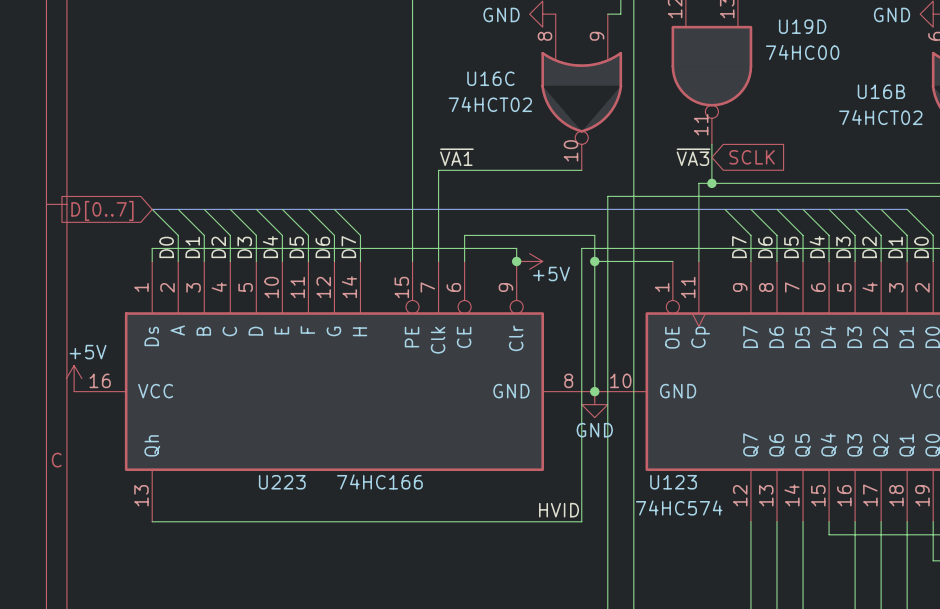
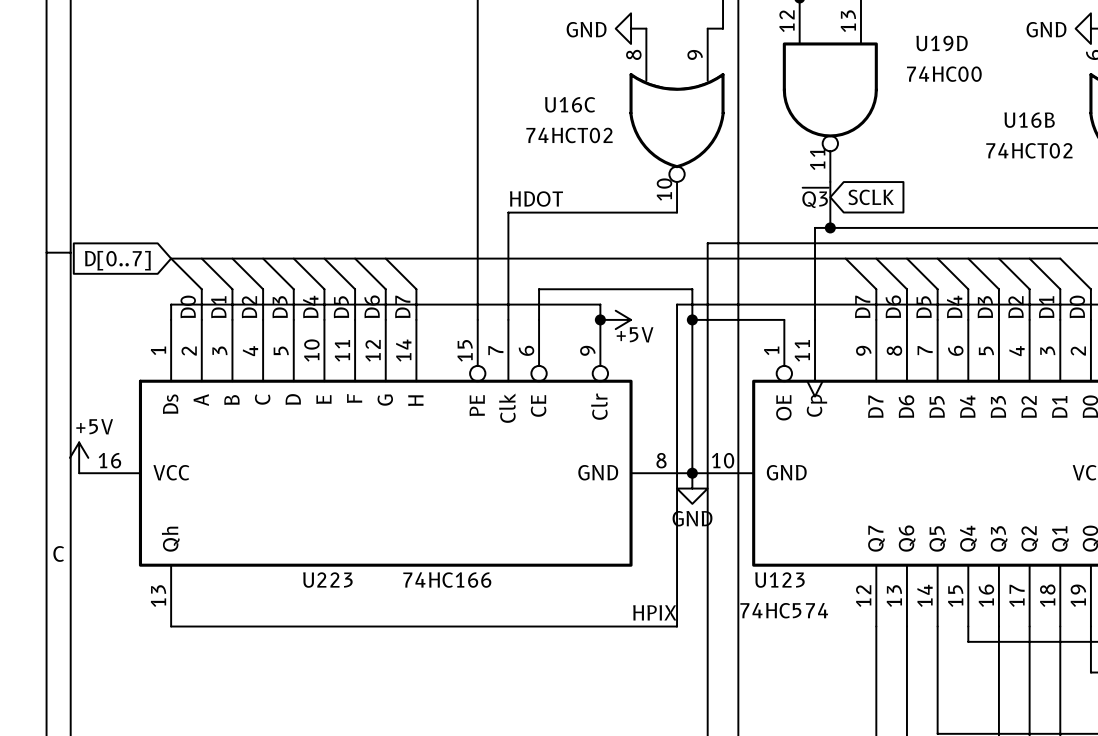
label: ~{VA1} (456, 157) -> HDOT (536, 199)
label: ~{VA3} (693, 157) -> ~{Q3} (815, 197)
label: HVID (559, 510) -> HPIX (654, 612)

